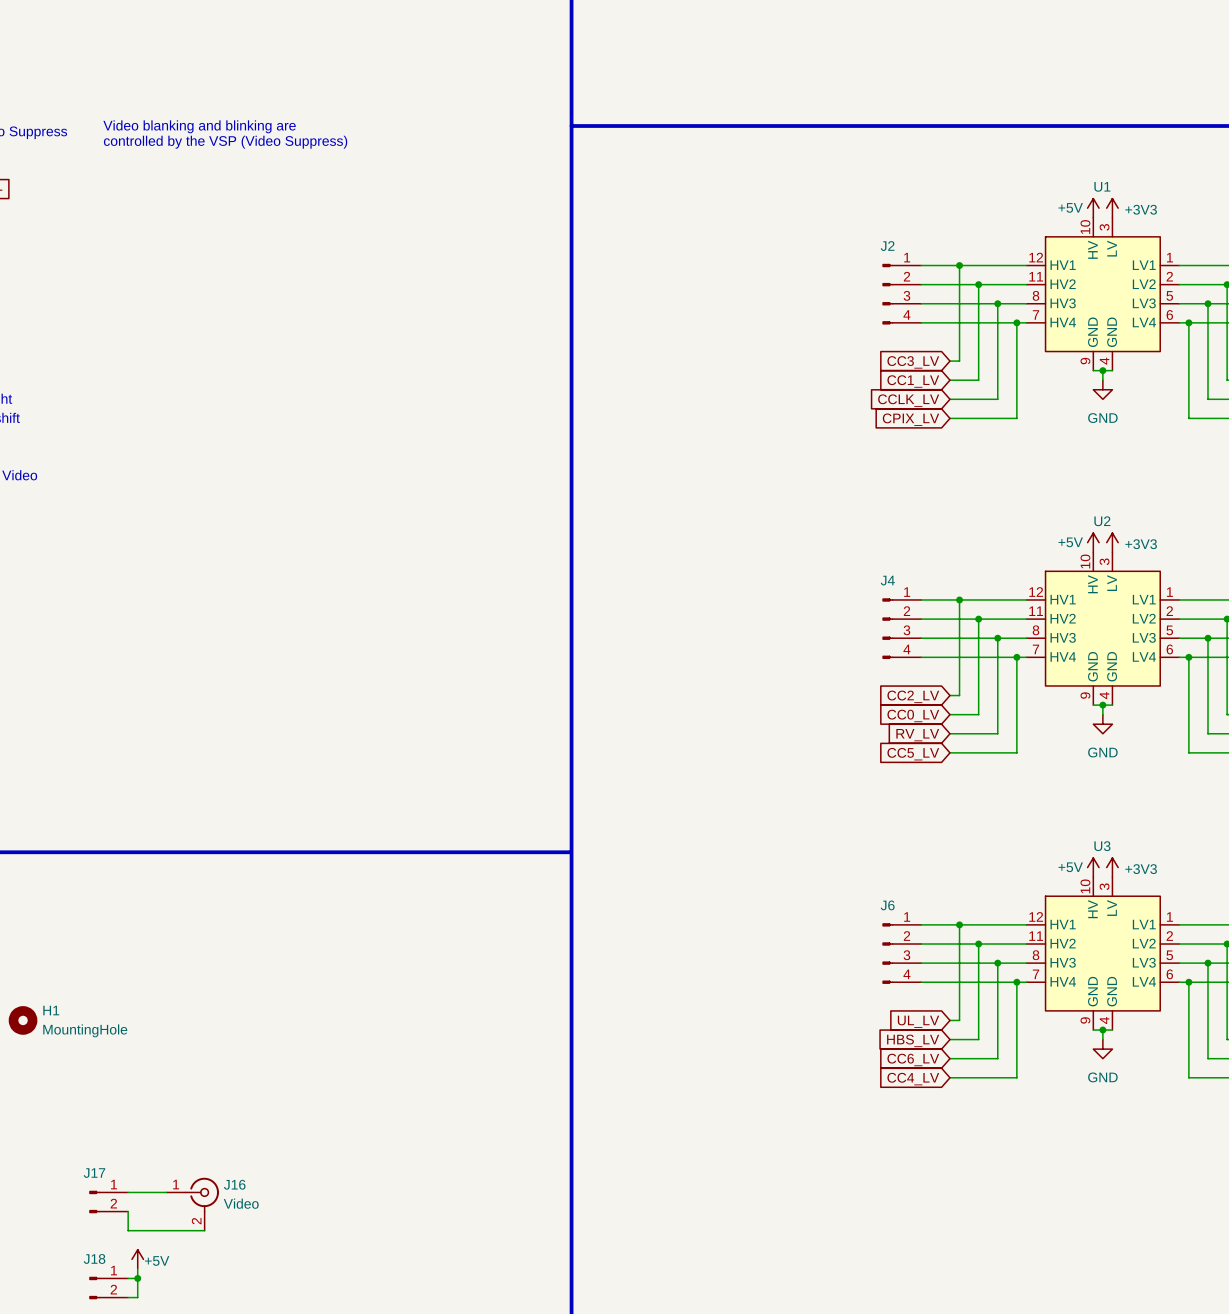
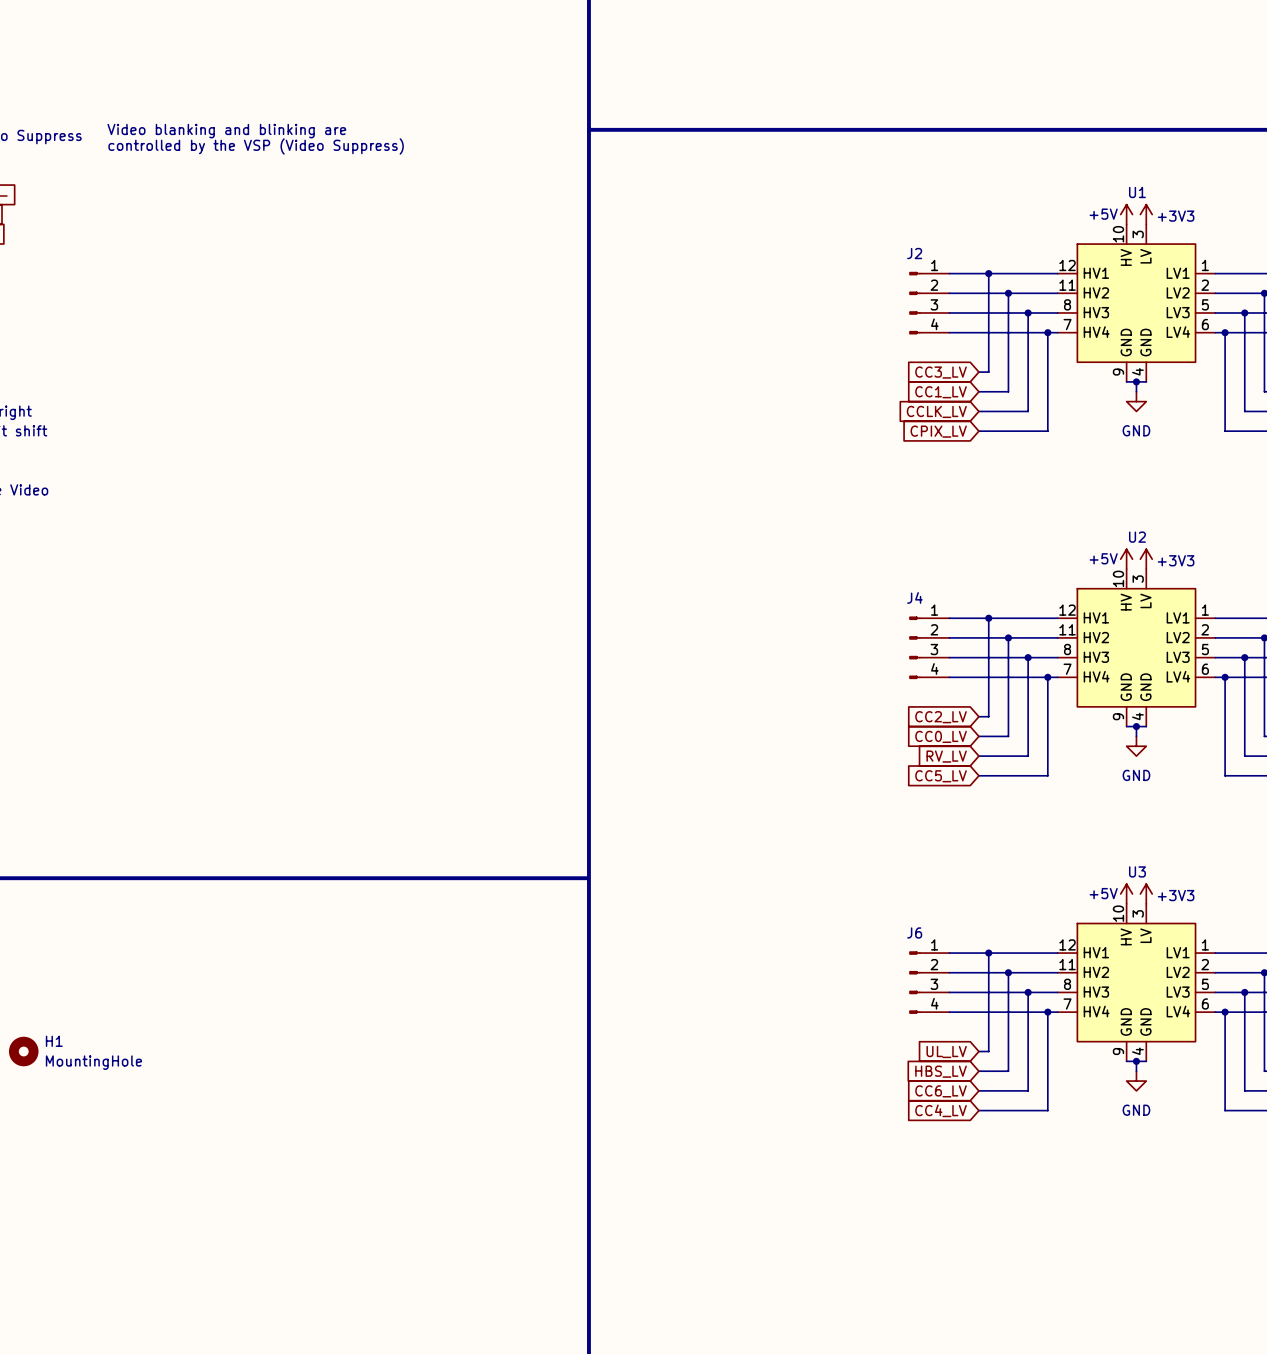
wire: (128, 1192) (166, 1192) -> none
J17: (108, 1202) -> none
J16: Video (192, 1204) -> none
wire: (128, 1211) (128, 1230) (204, 1230) -> none
power symbol: +5V (137, 1259) -> none
wire: (137, 1268) (137, 1297) (128, 1297) -> none
wire: (128, 1278) (137, 1278) -> none
junction: (137, 1278) -> none
J18: (108, 1288) -> none

